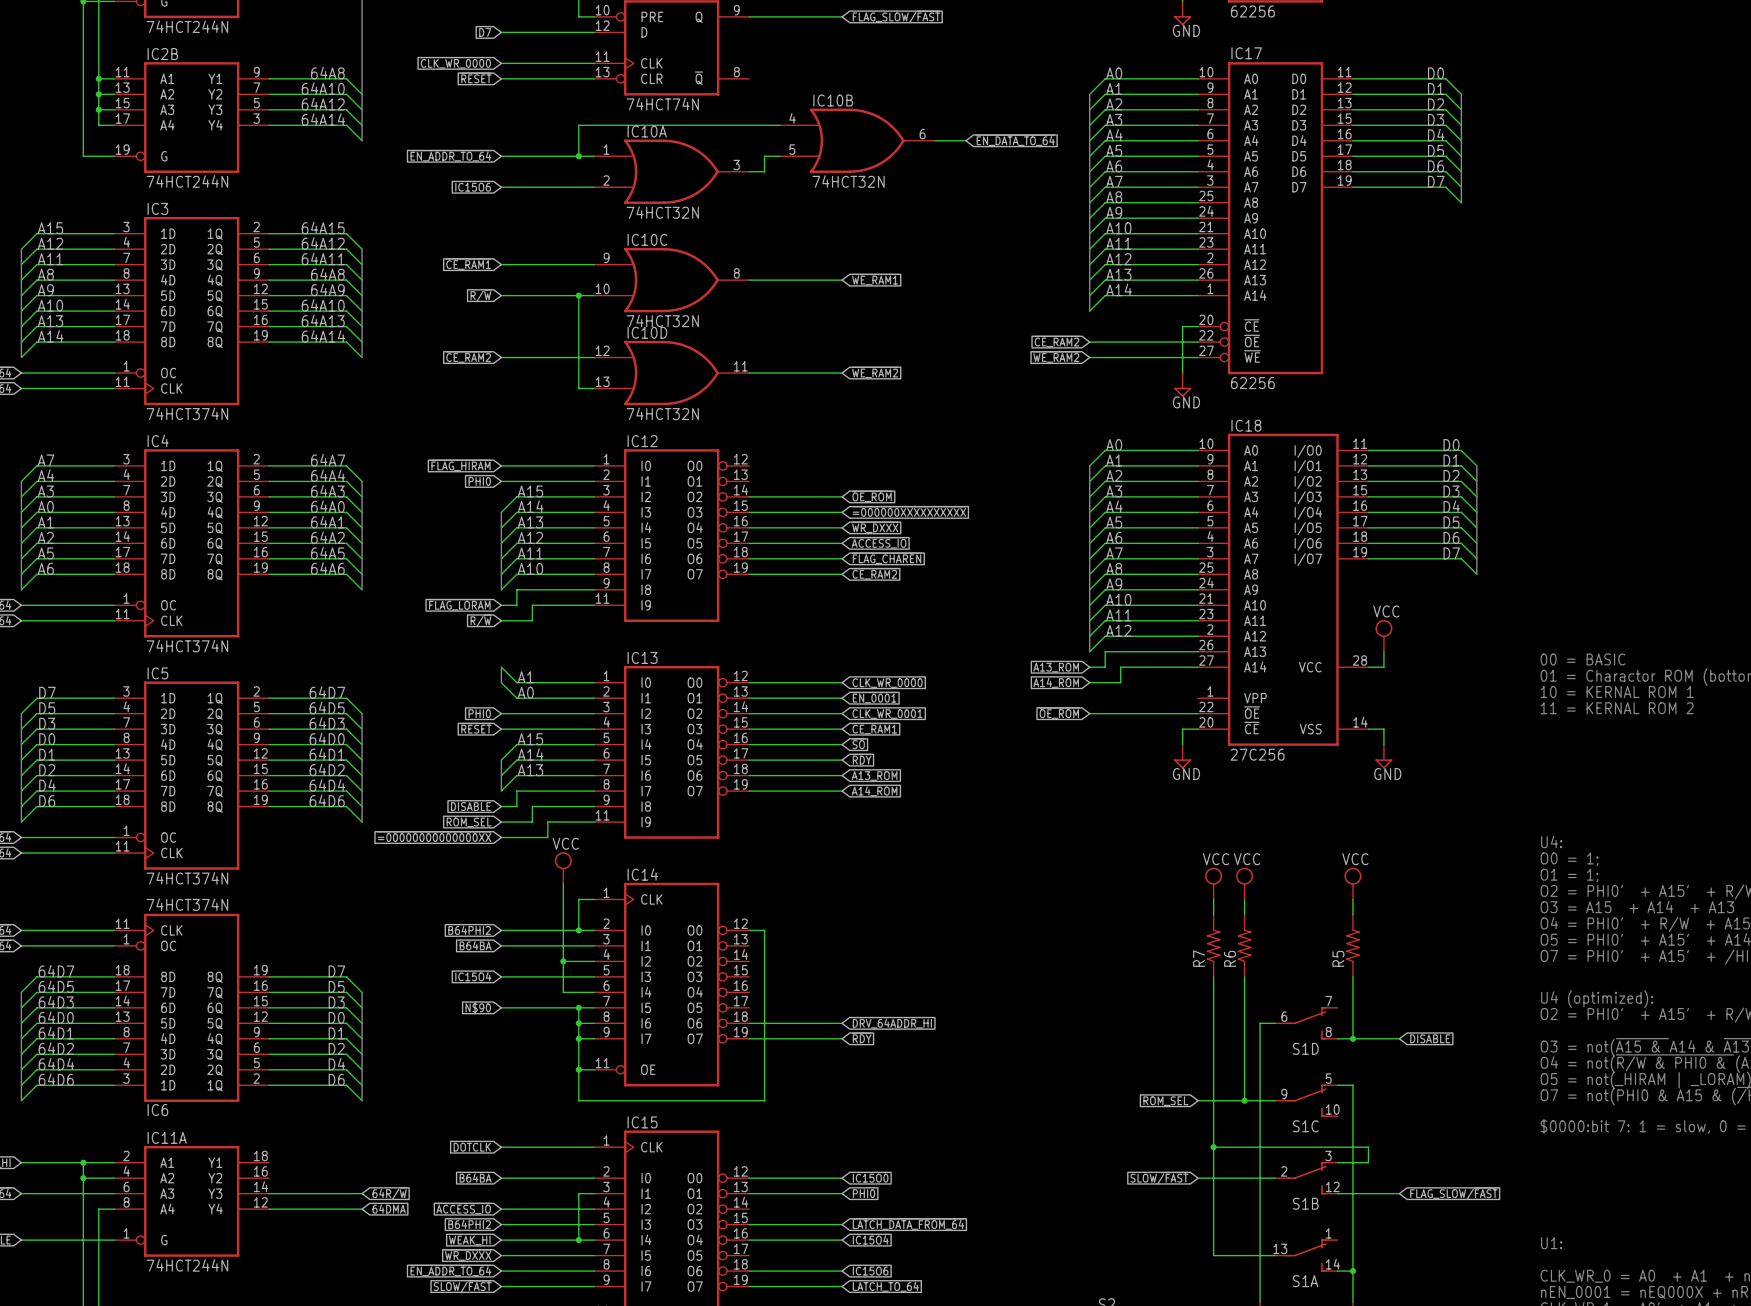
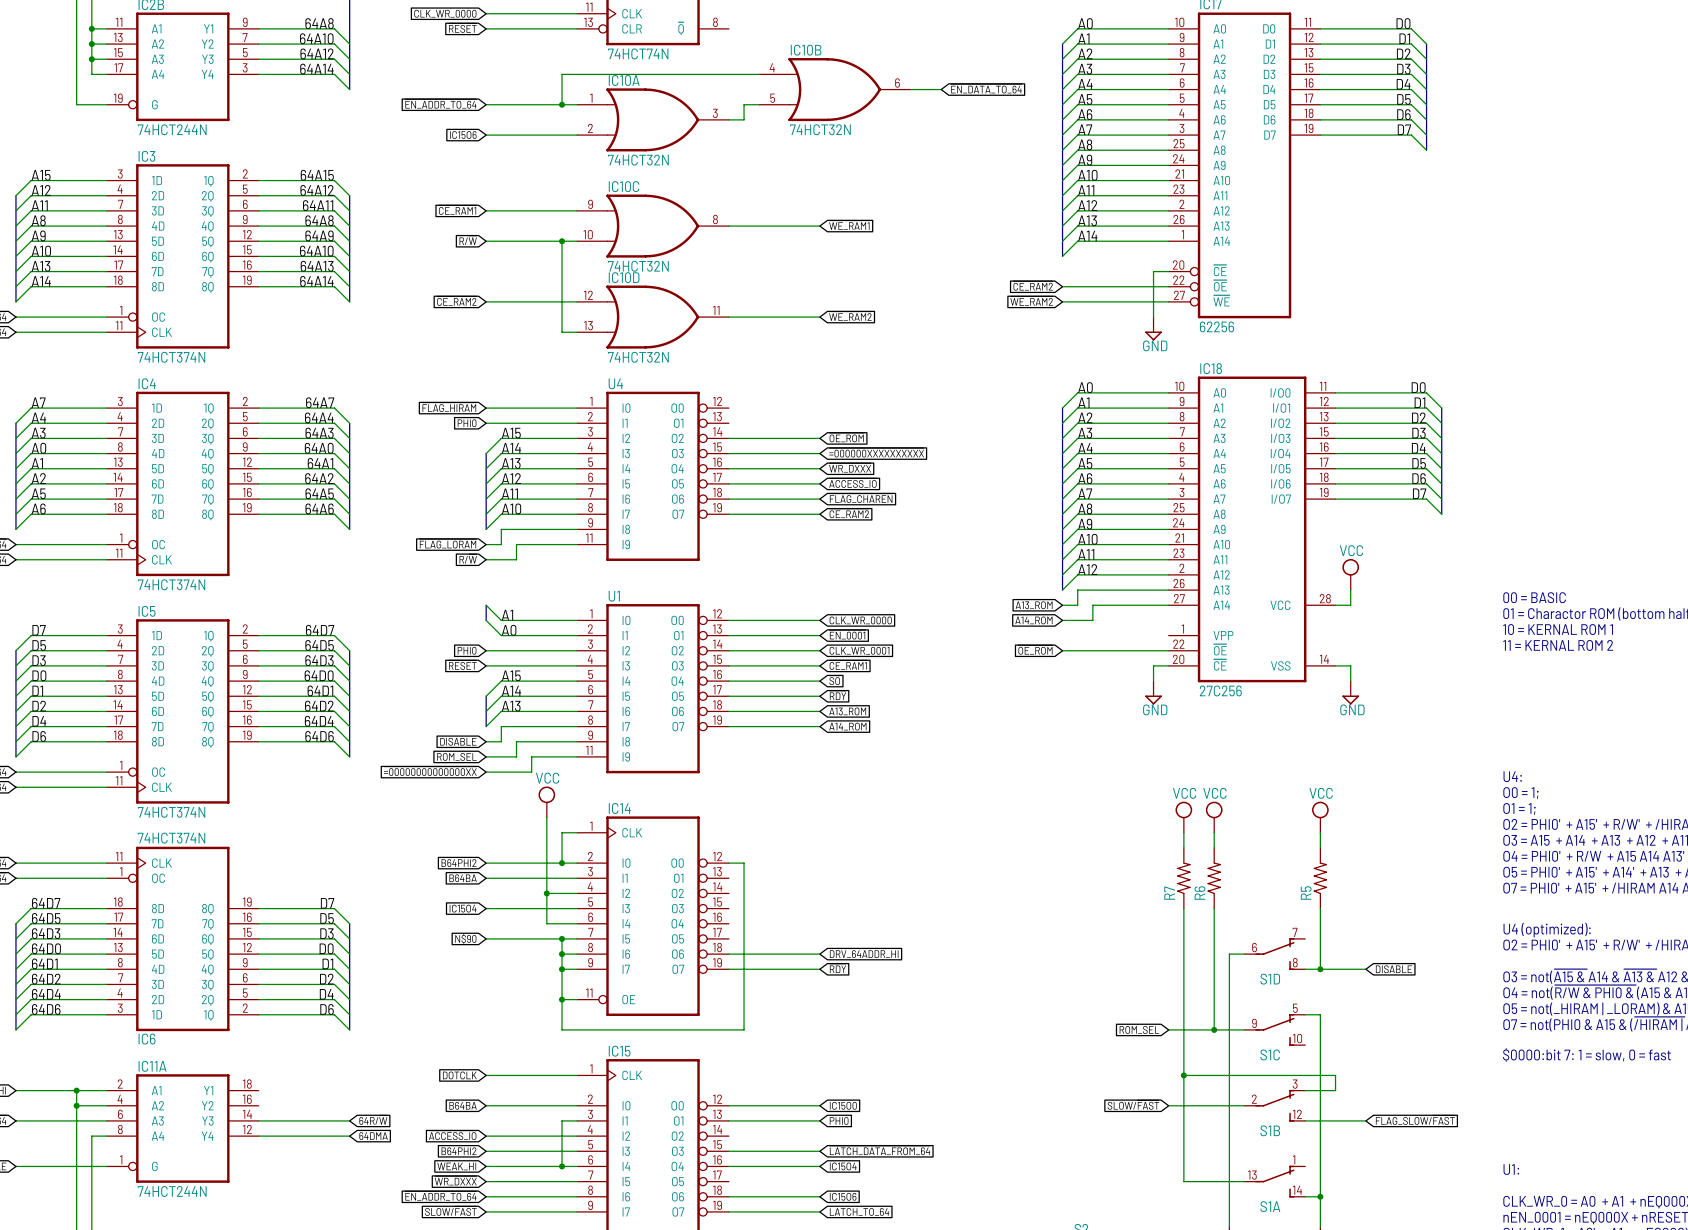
IC12 name: IC12 (642, 441) -> U4 (615, 383)
IC13 name: IC13 (642, 657) -> U1 (614, 596)

